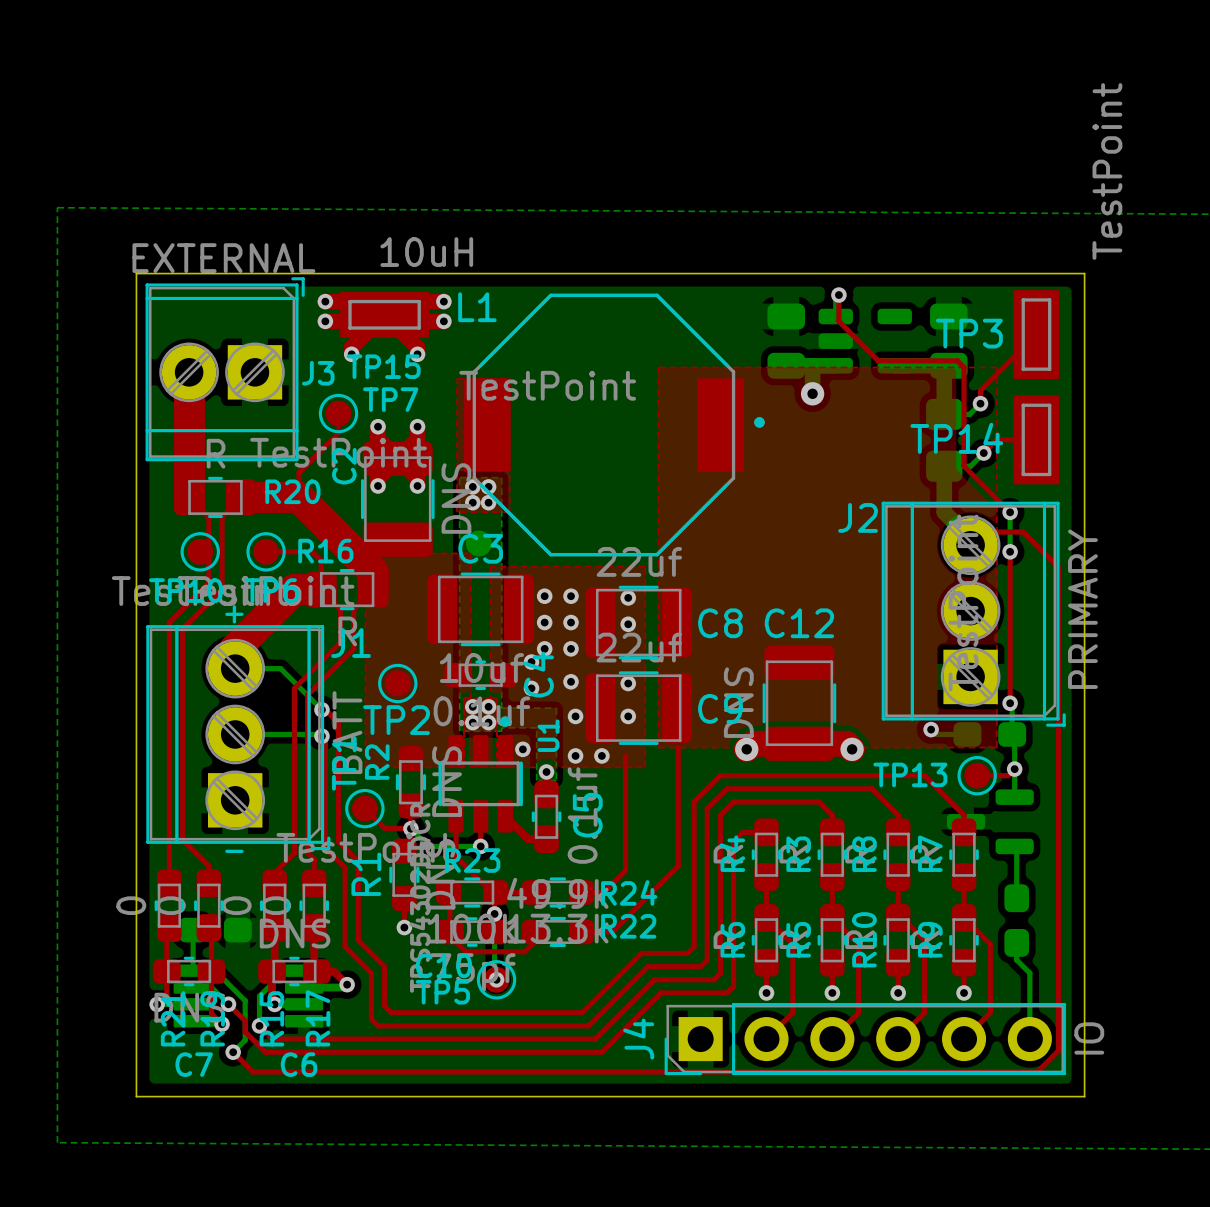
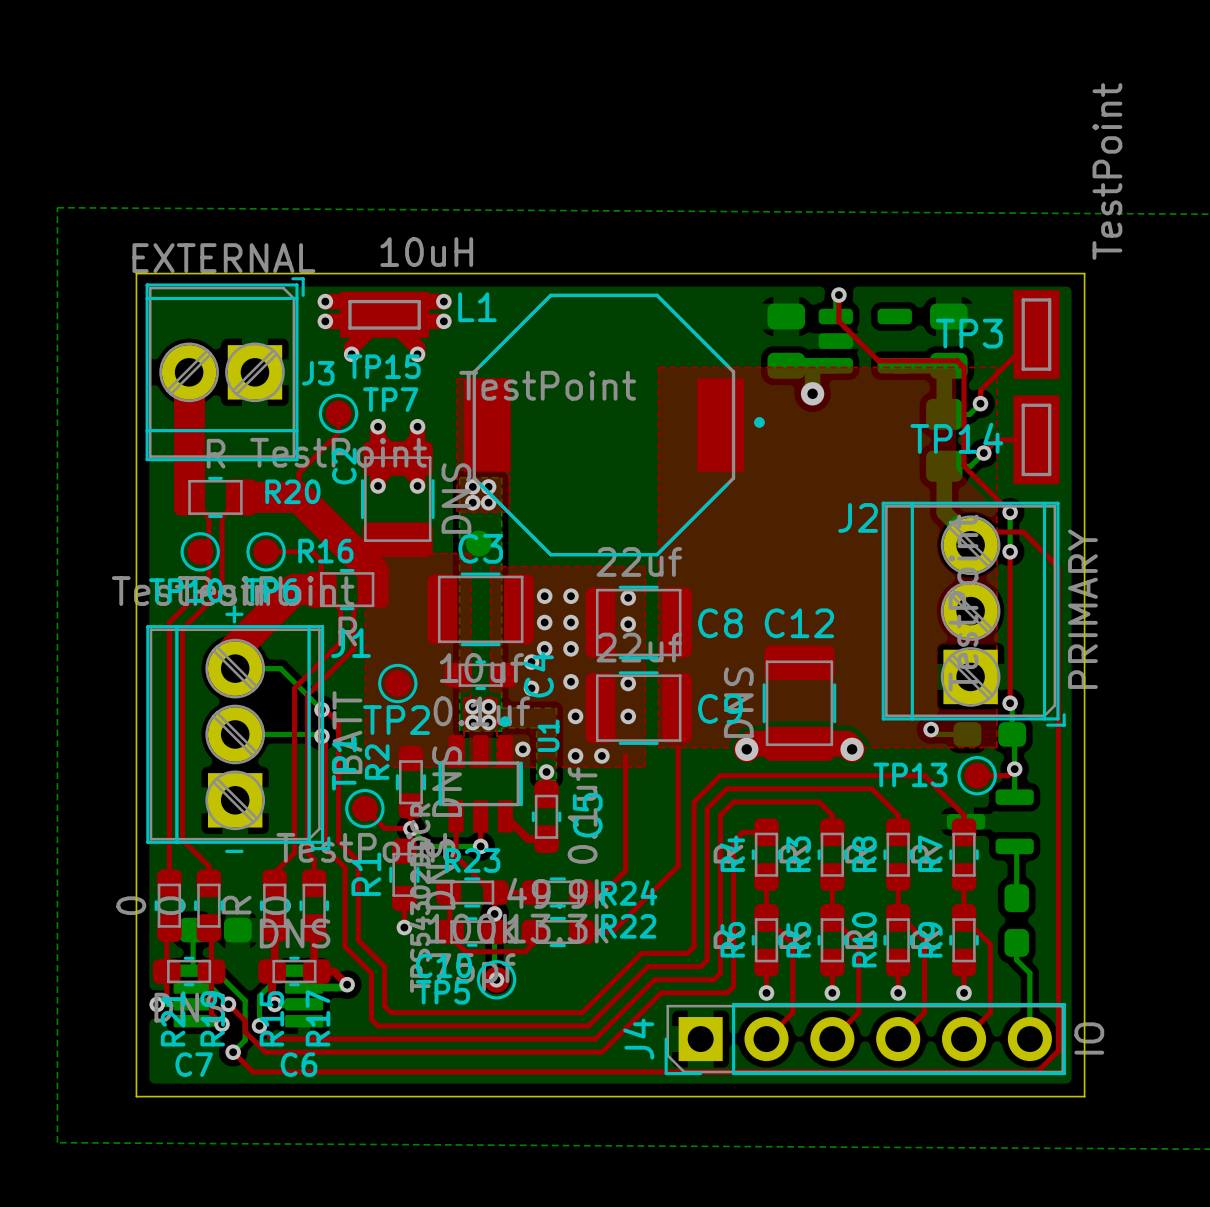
R15 value: 0 (236, 905) -> R (236, 905)

